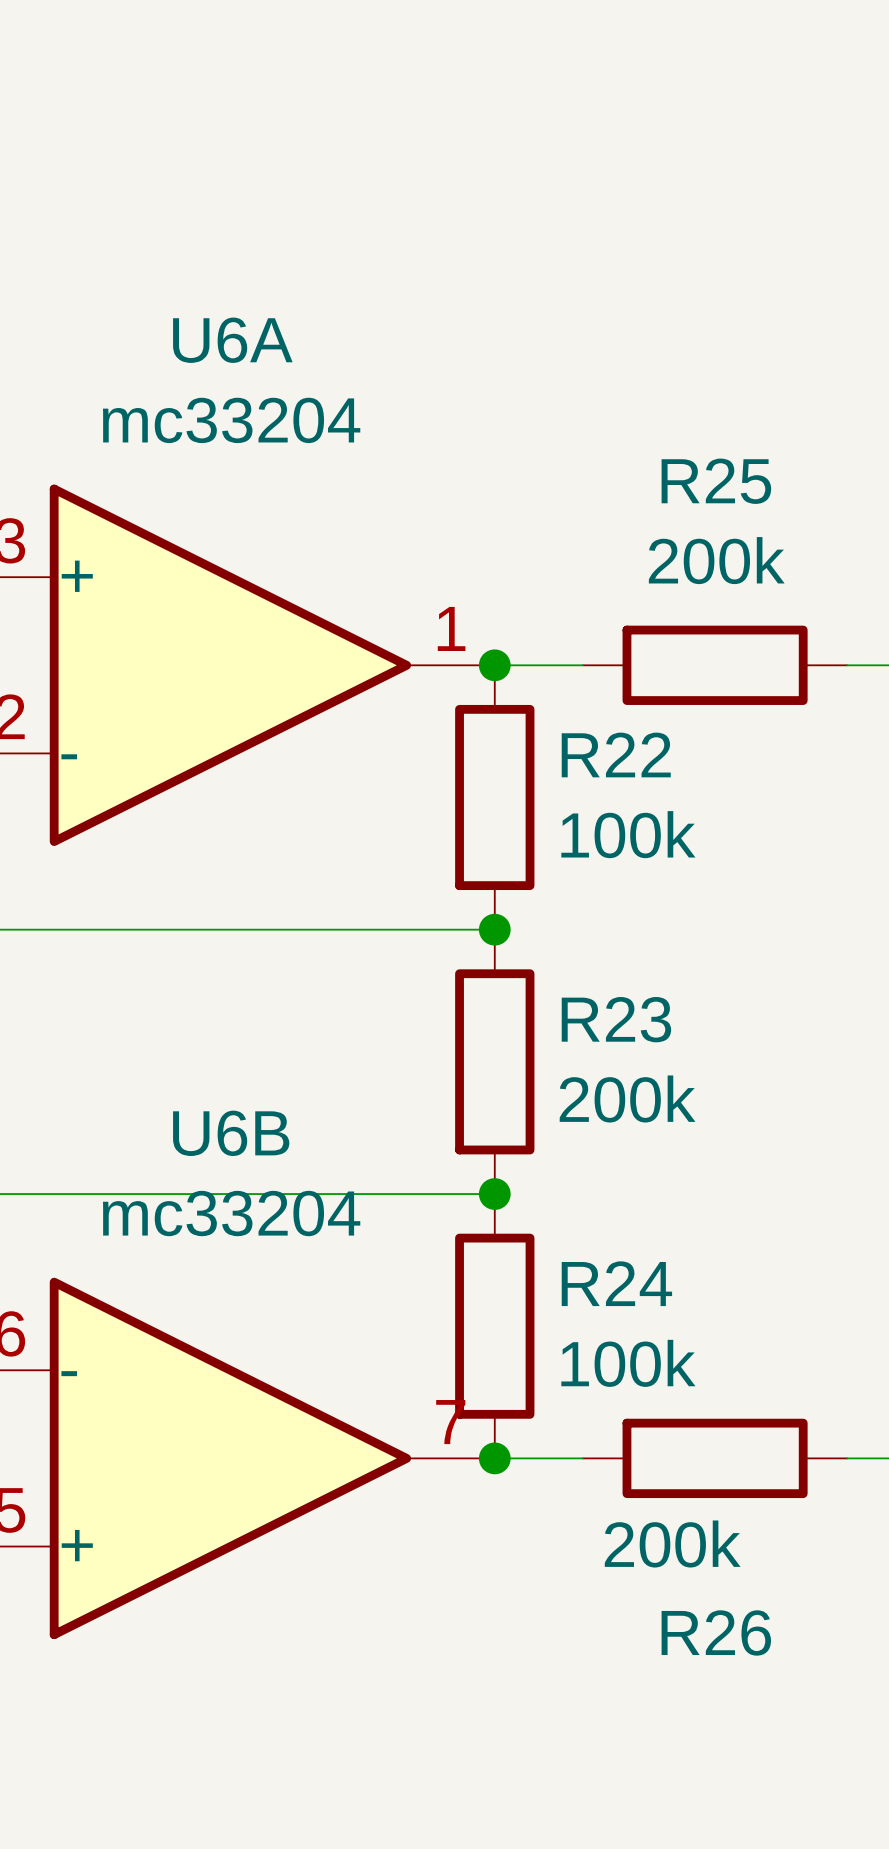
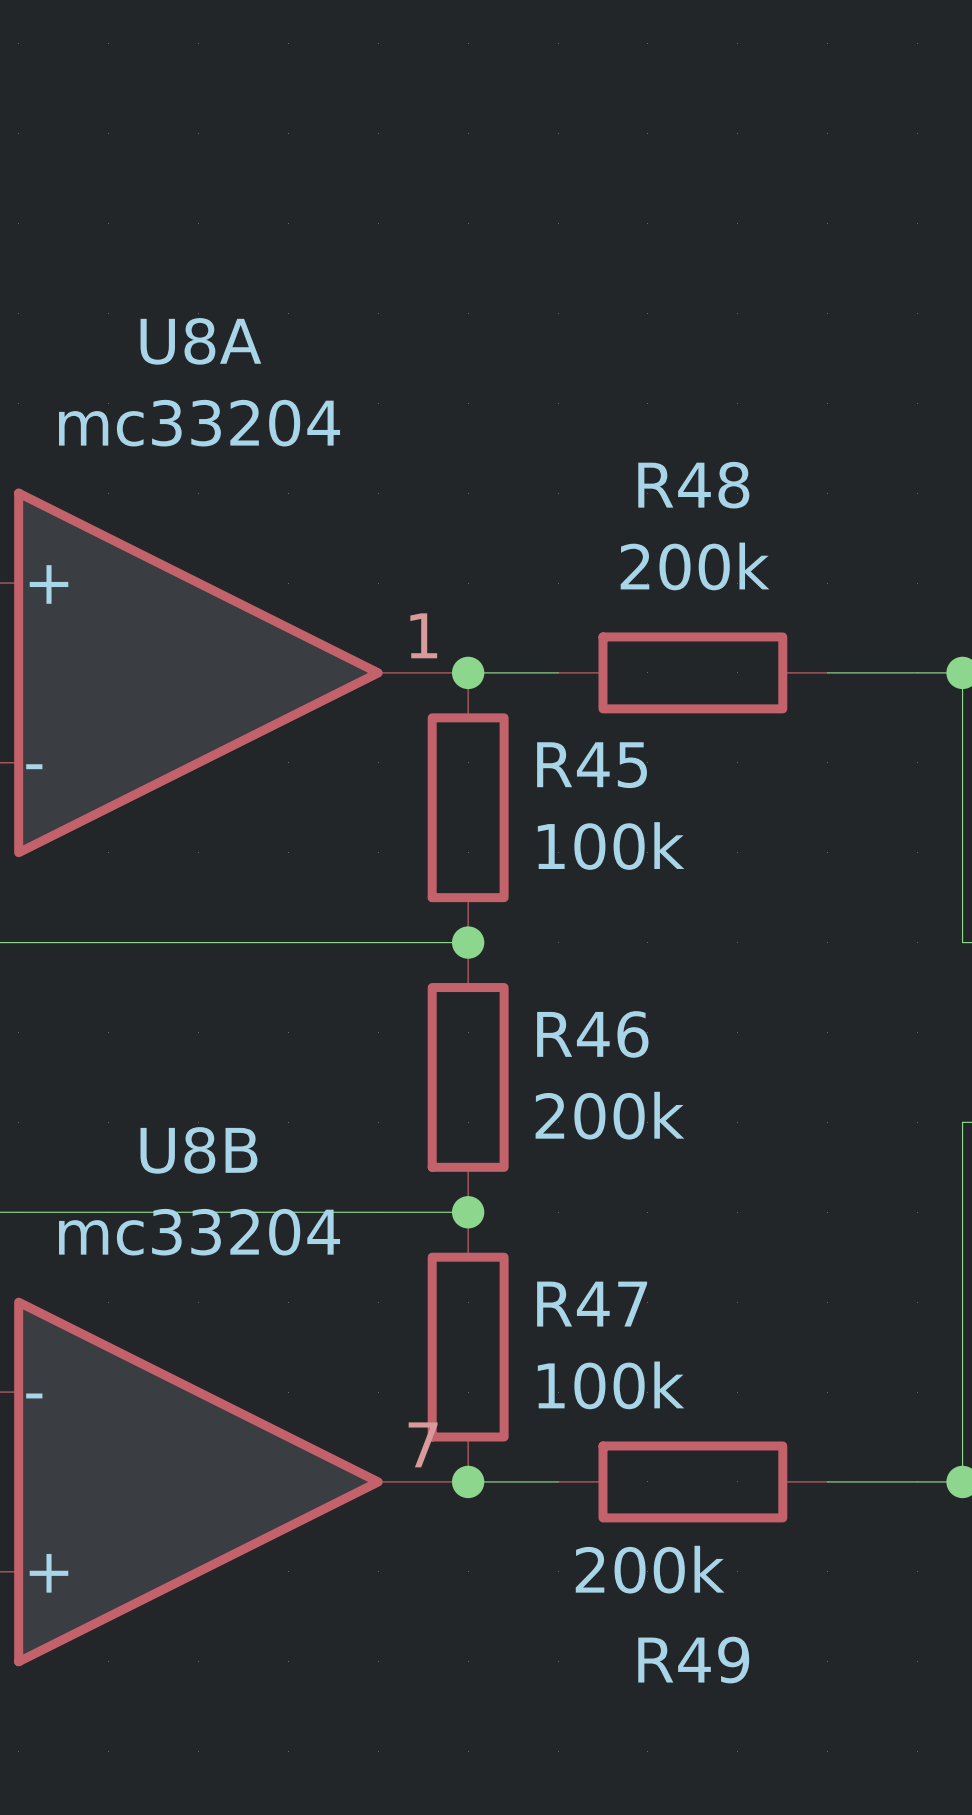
U6A name: U6A (232, 340) -> U8A (200, 341)
R25 name: R25 (716, 481) -> R48 (693, 485)
R22 name: R22 (616, 754) -> R45 (592, 765)
R23 name: R23 (616, 1019) -> R46 (592, 1034)
U6B name: U6B (231, 1133) -> U8B (198, 1150)
R24 name: R24 (616, 1283) -> R47 (592, 1304)
R26 name: R26 (716, 1632) -> R49 (693, 1660)

